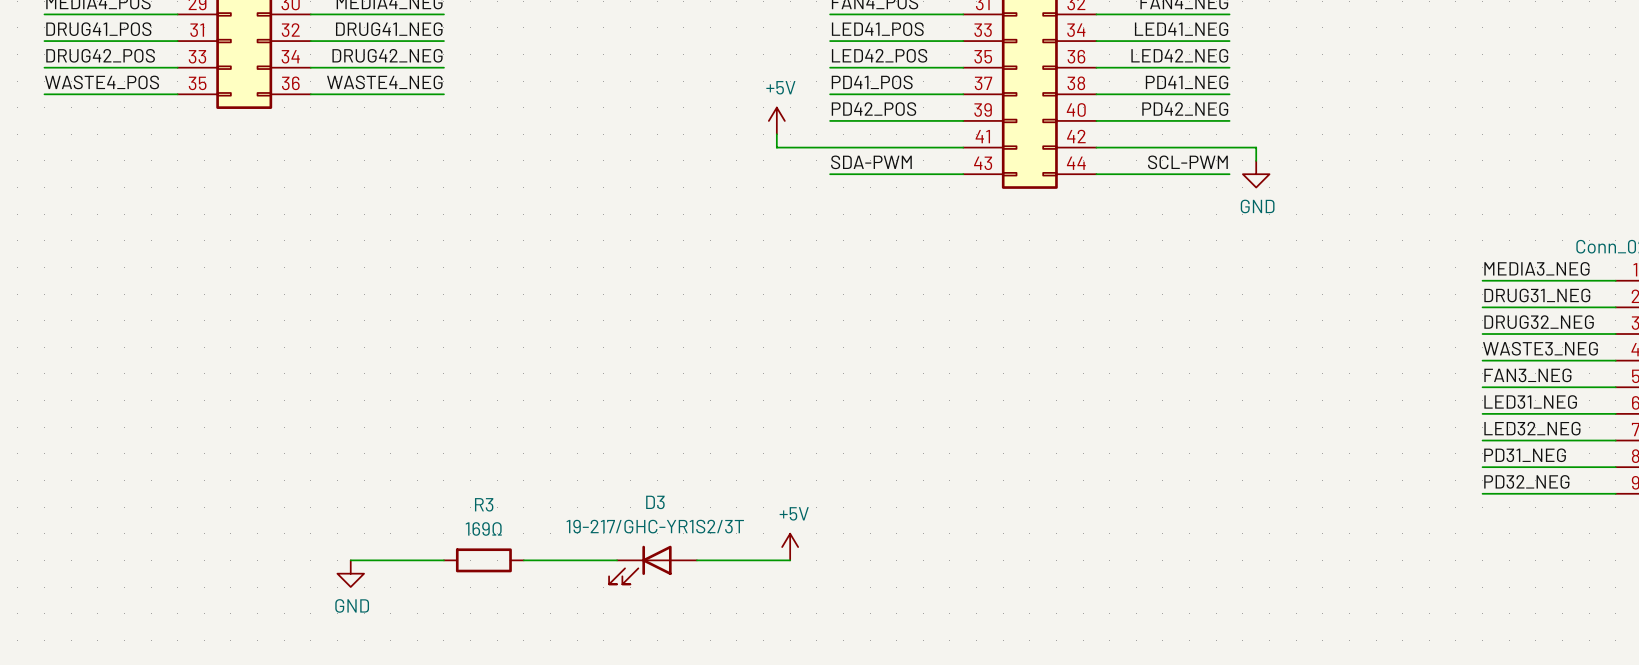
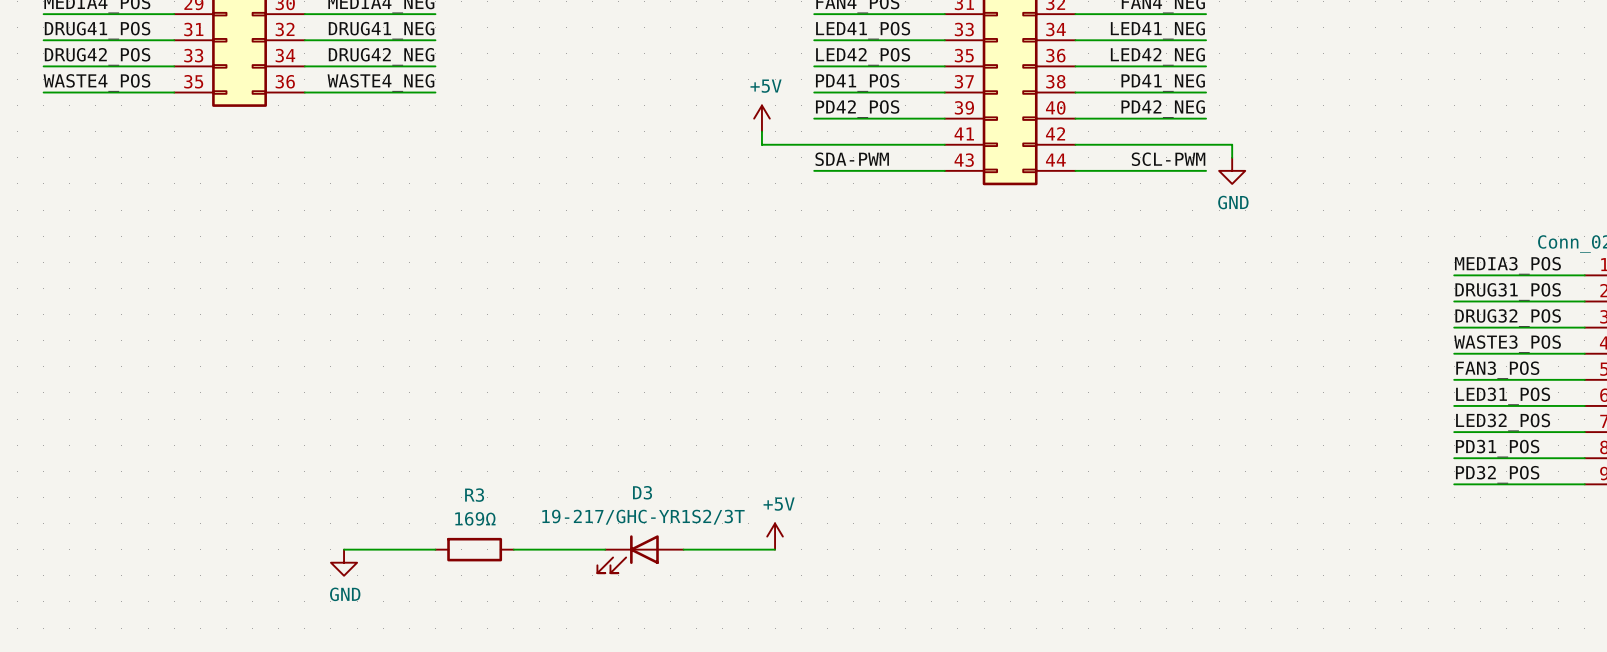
label: MEDIA3_NEG (1536, 268) -> MEDIA3_POS (1507, 265)
label: DRUG31_NEG (1537, 295) -> DRUG31_POS (1508, 291)
label: DRUG32_NEG (1539, 322) -> DRUG32_POS (1508, 317)
label: WASTE3_NEG (1540, 348) -> WASTE3_POS (1507, 344)
label: FAN3_NEG (1527, 375) -> FAN3_POS (1497, 370)
label: LED31_NEG (1530, 402) -> LED31_POS (1503, 396)
label: LED32_NEG (1532, 428) -> LED32_POS (1503, 422)
label: PD31_NEG (1525, 455) -> PD31_POS (1497, 448)
label: PD32_NEG (1526, 481) -> PD32_POS (1497, 474)

